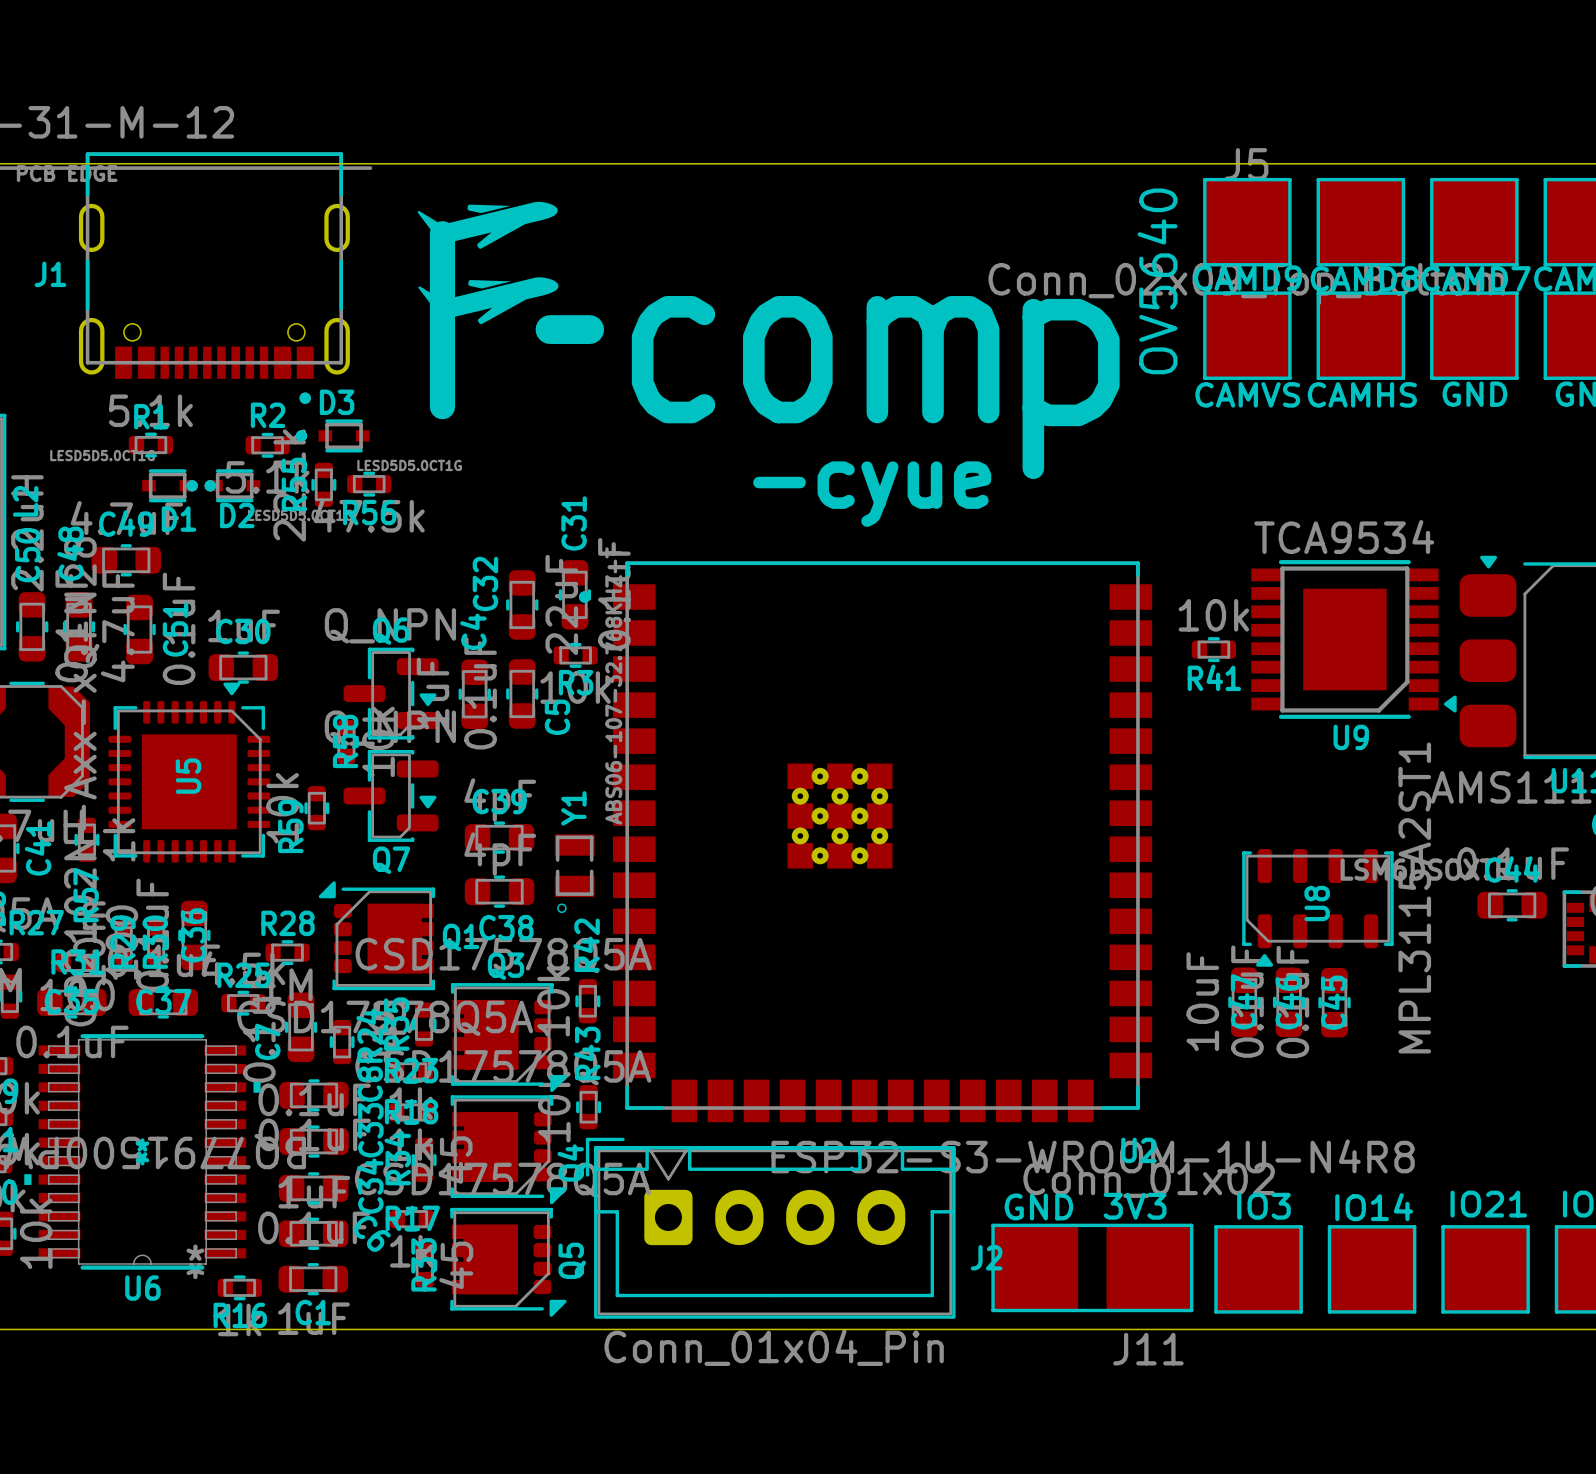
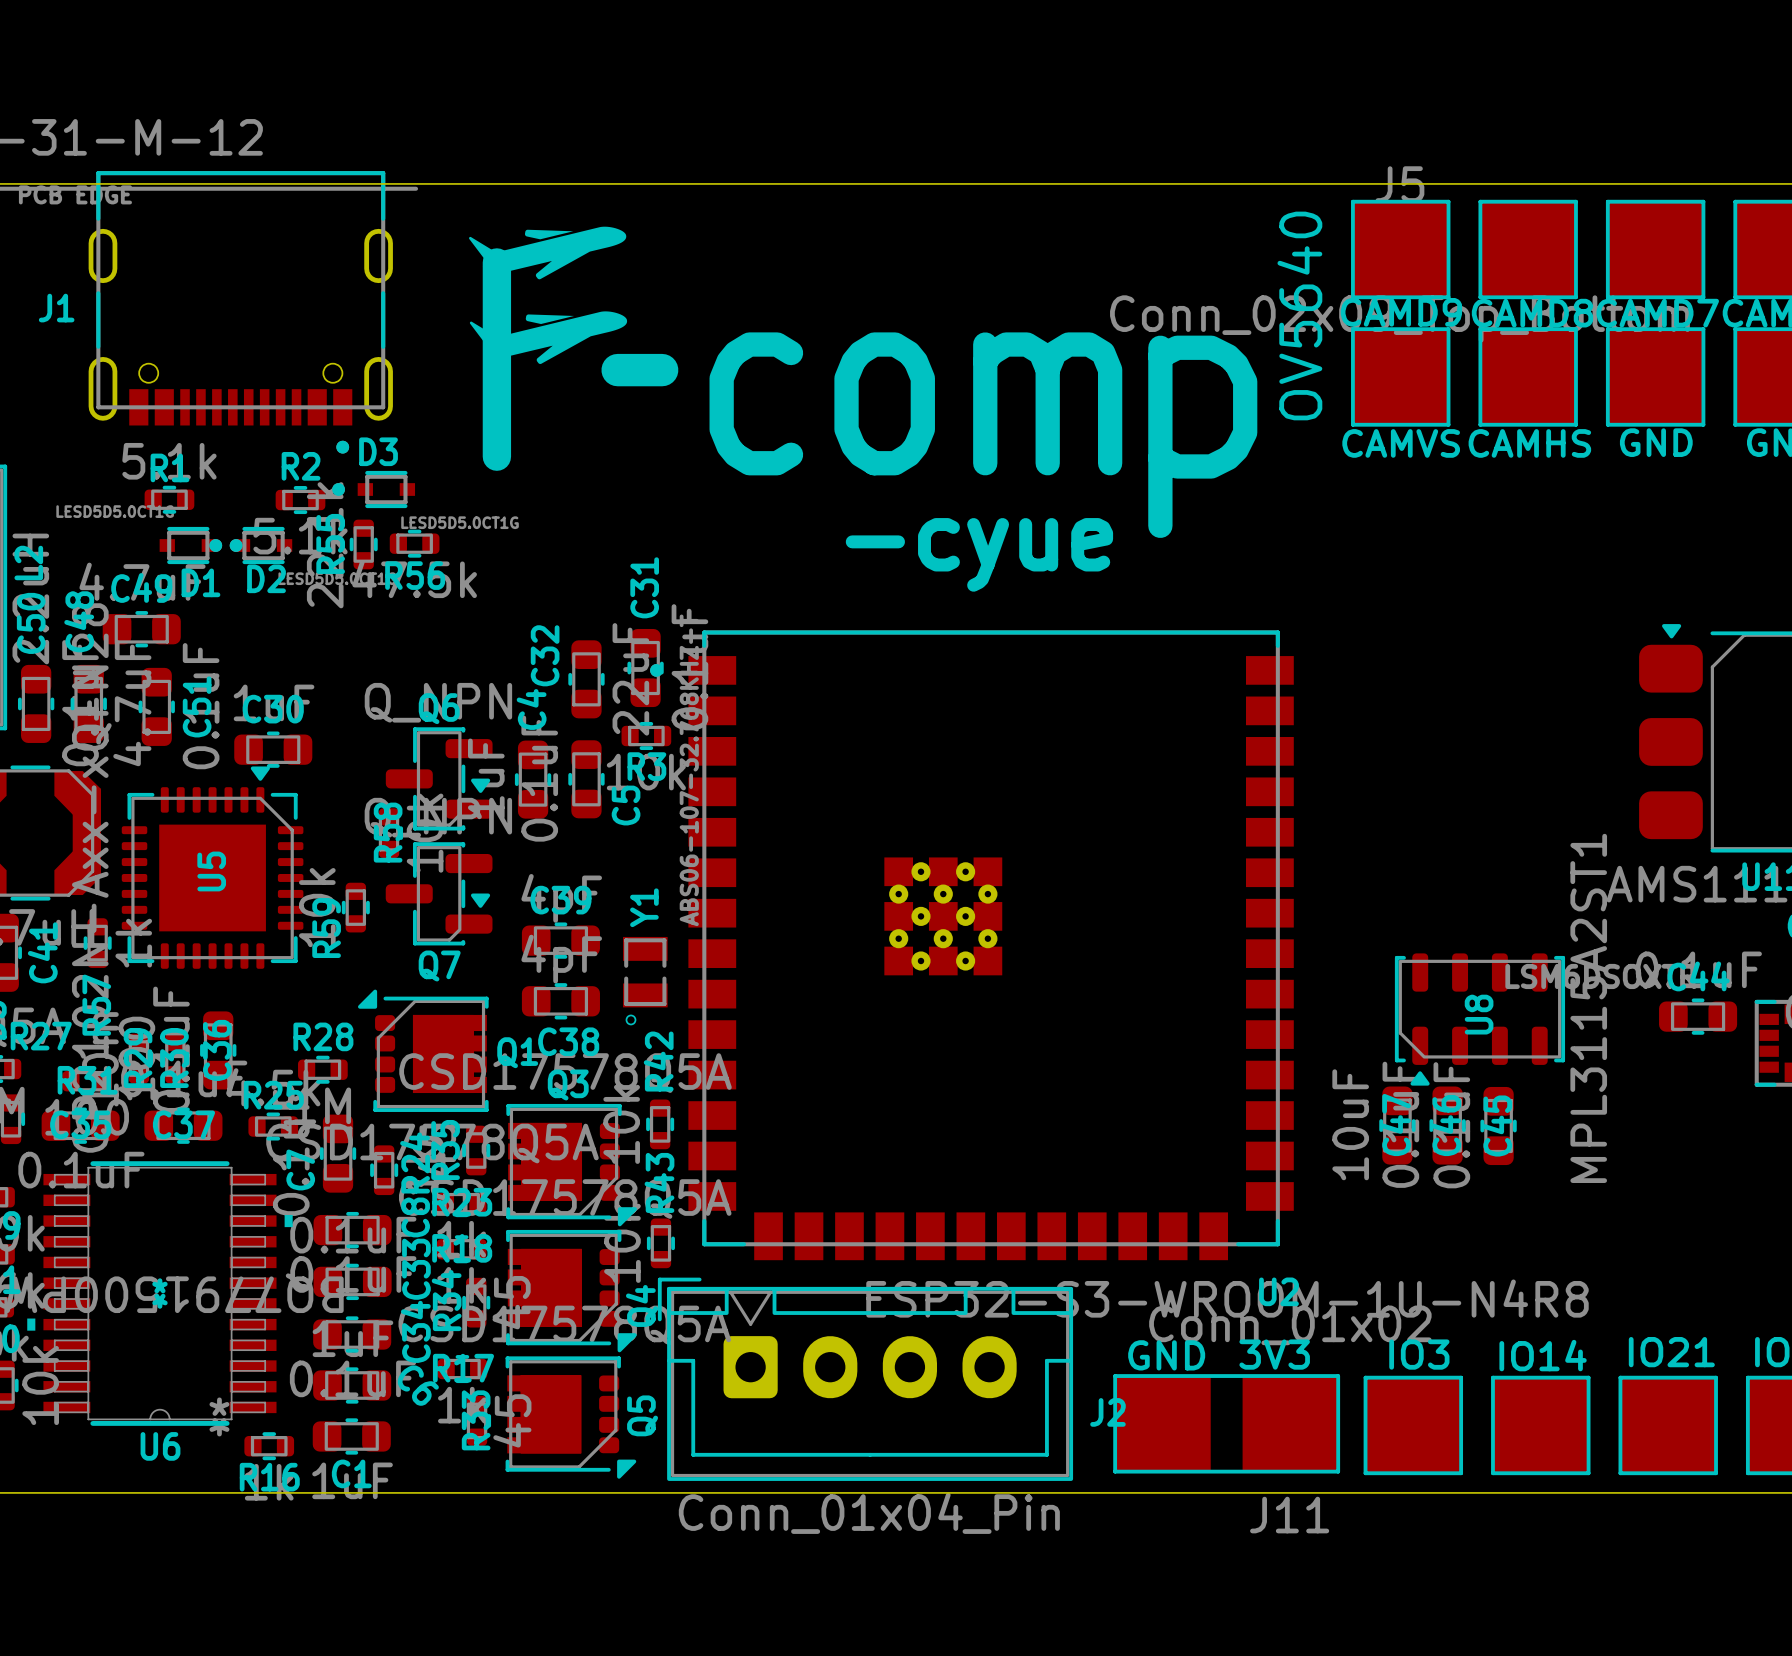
U9: TCA9534 (1353, 639) -> none
R41: 10k (1213, 649) -> none

